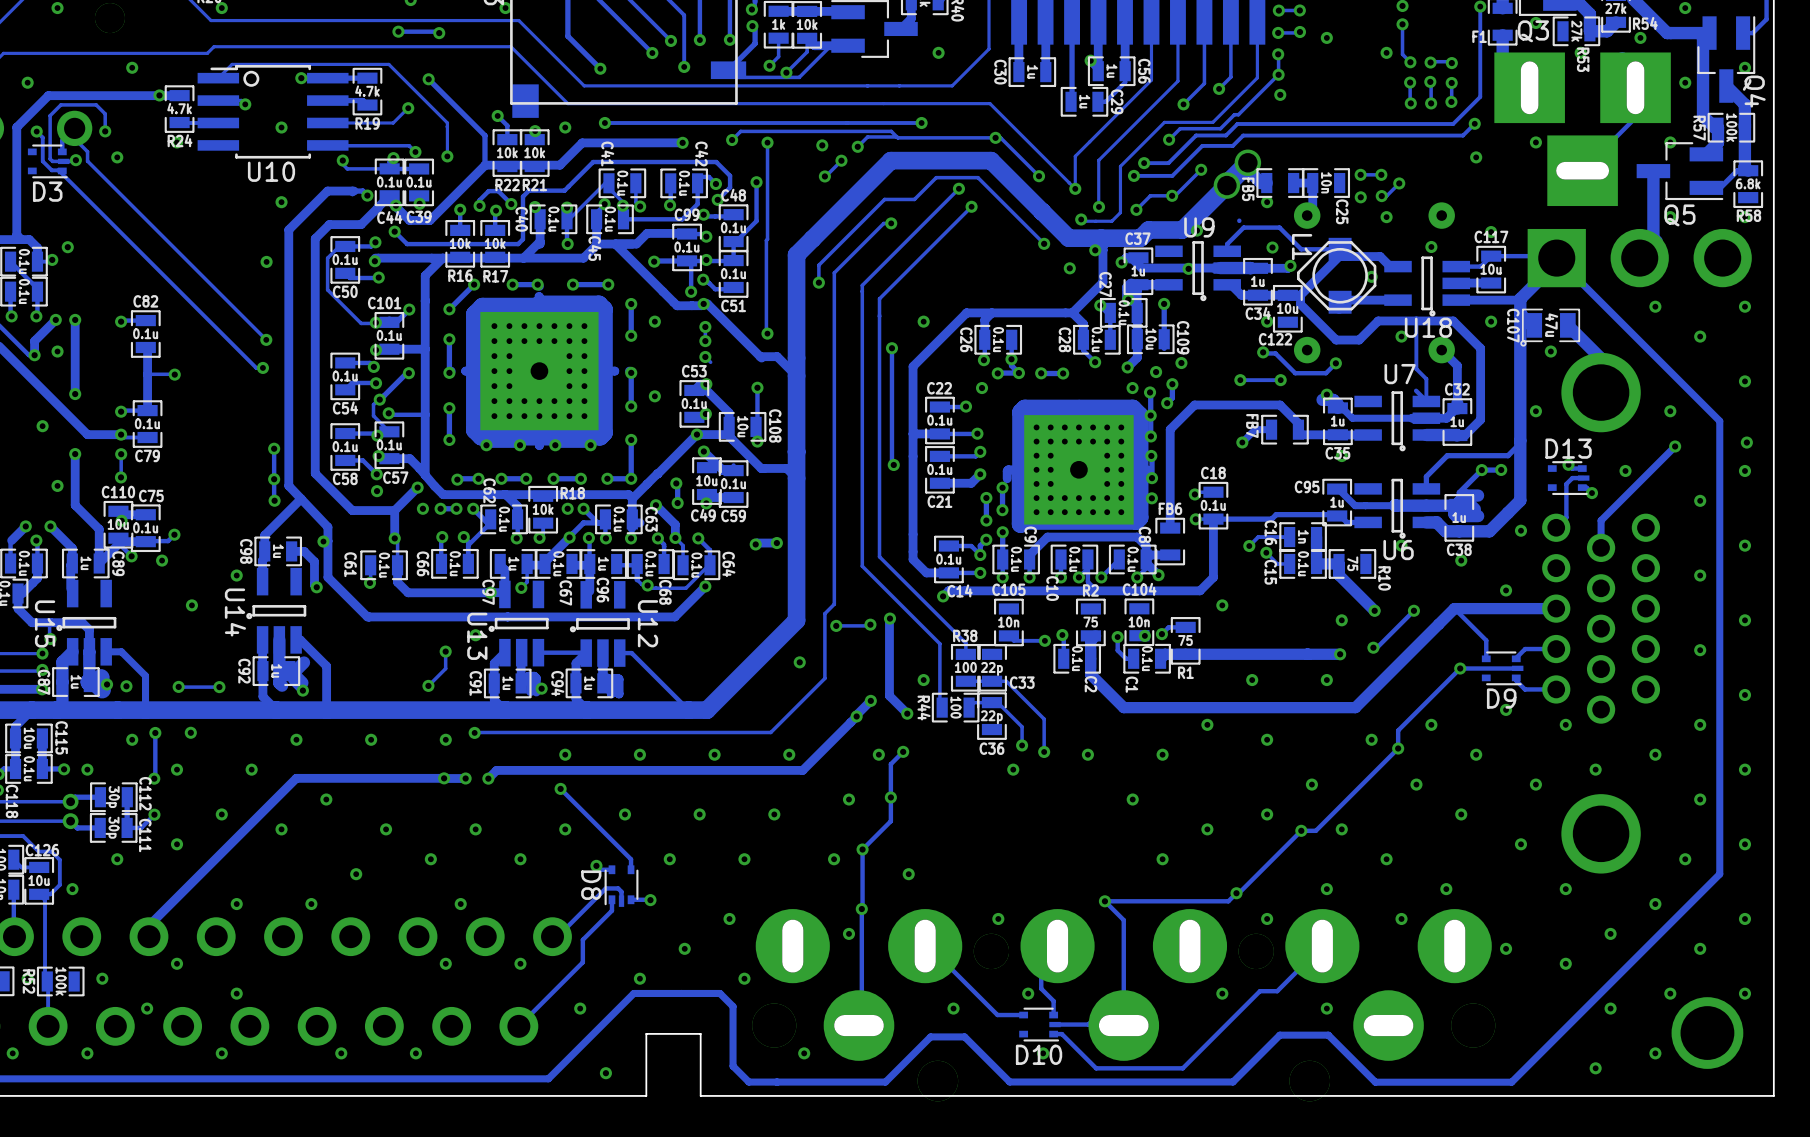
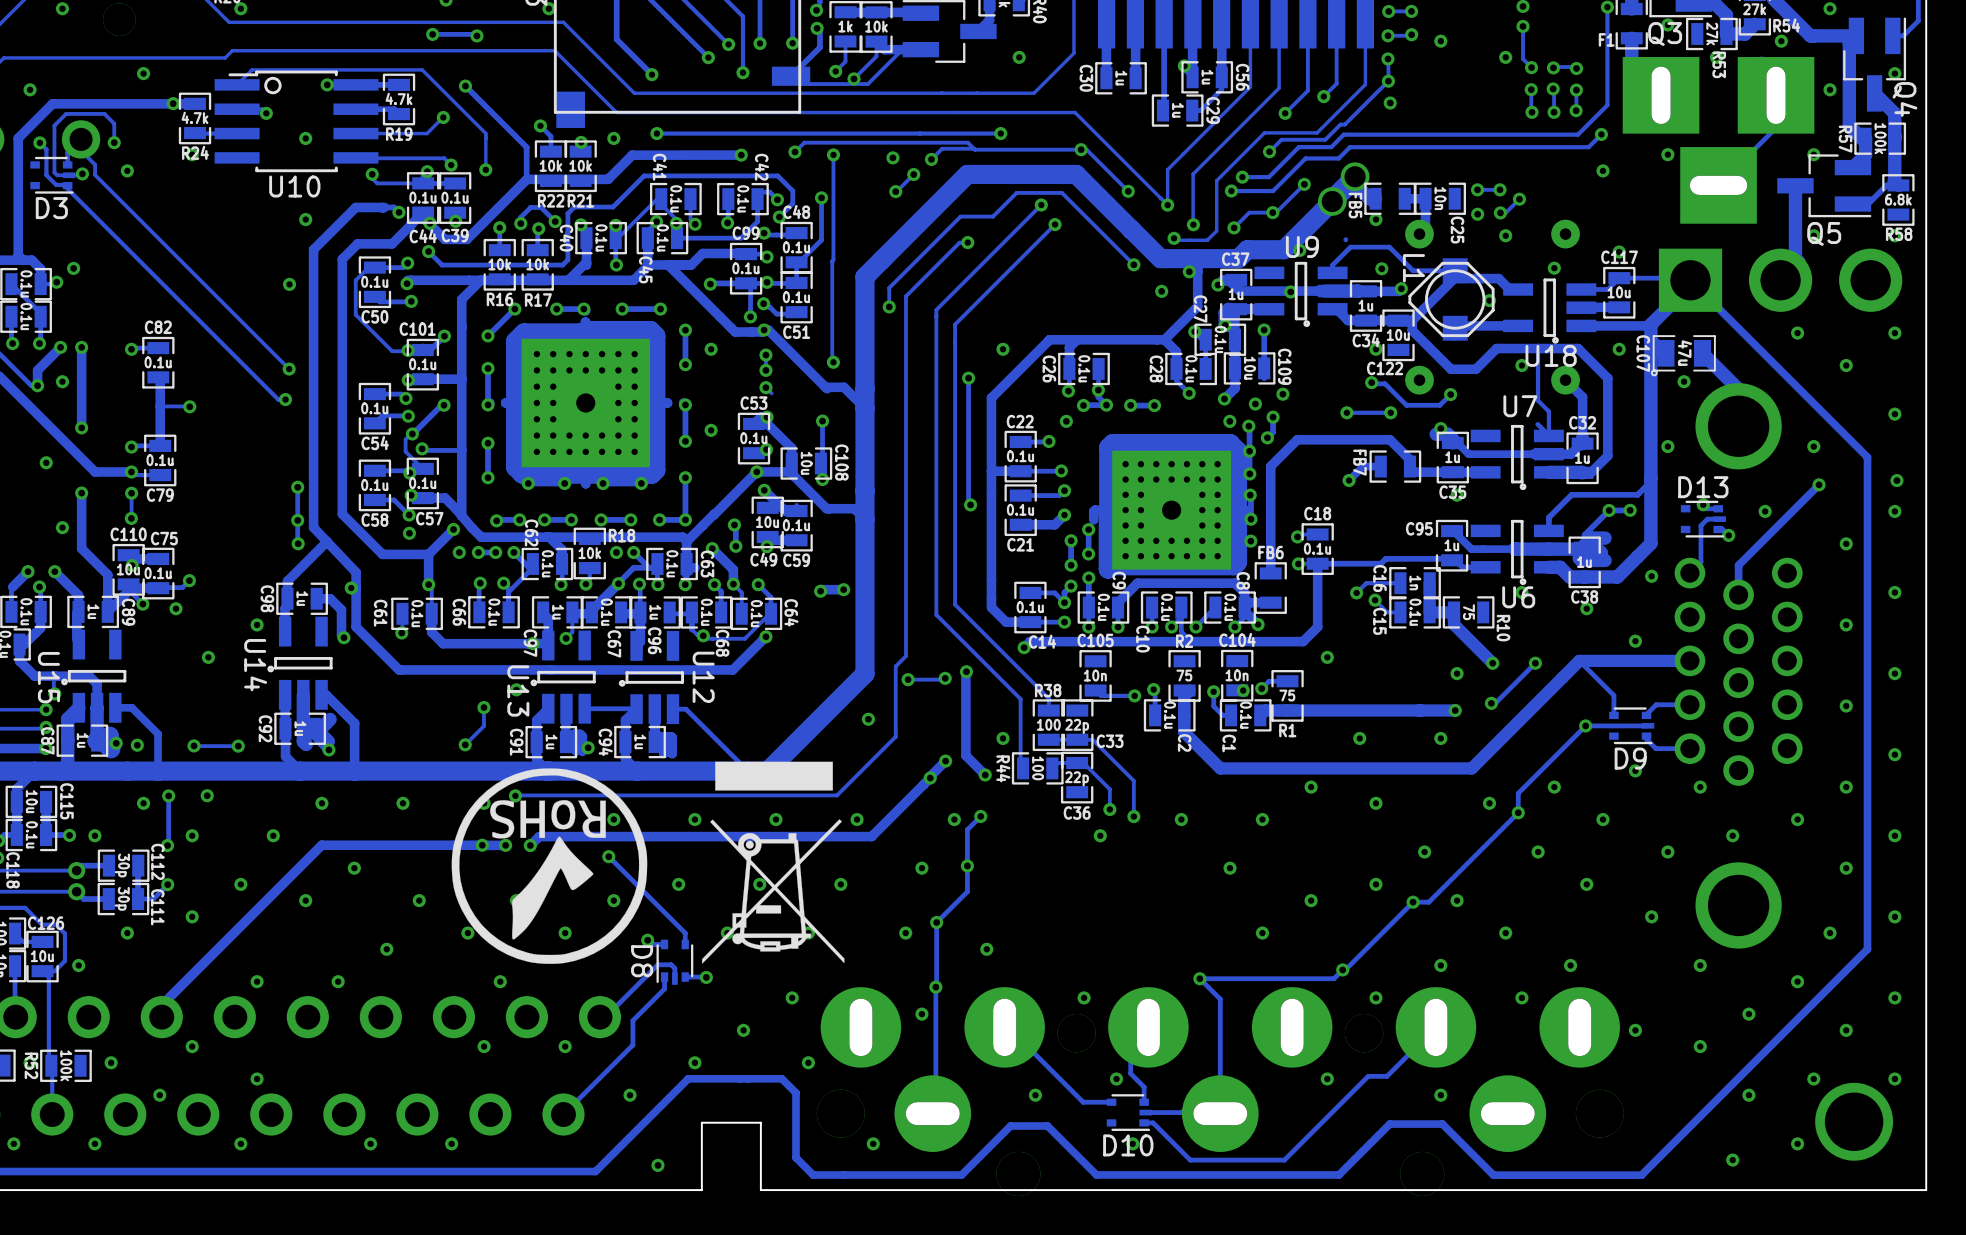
drawing: none -> [702, 761, 845, 964]
drawing: none -> [451, 768, 648, 964]

